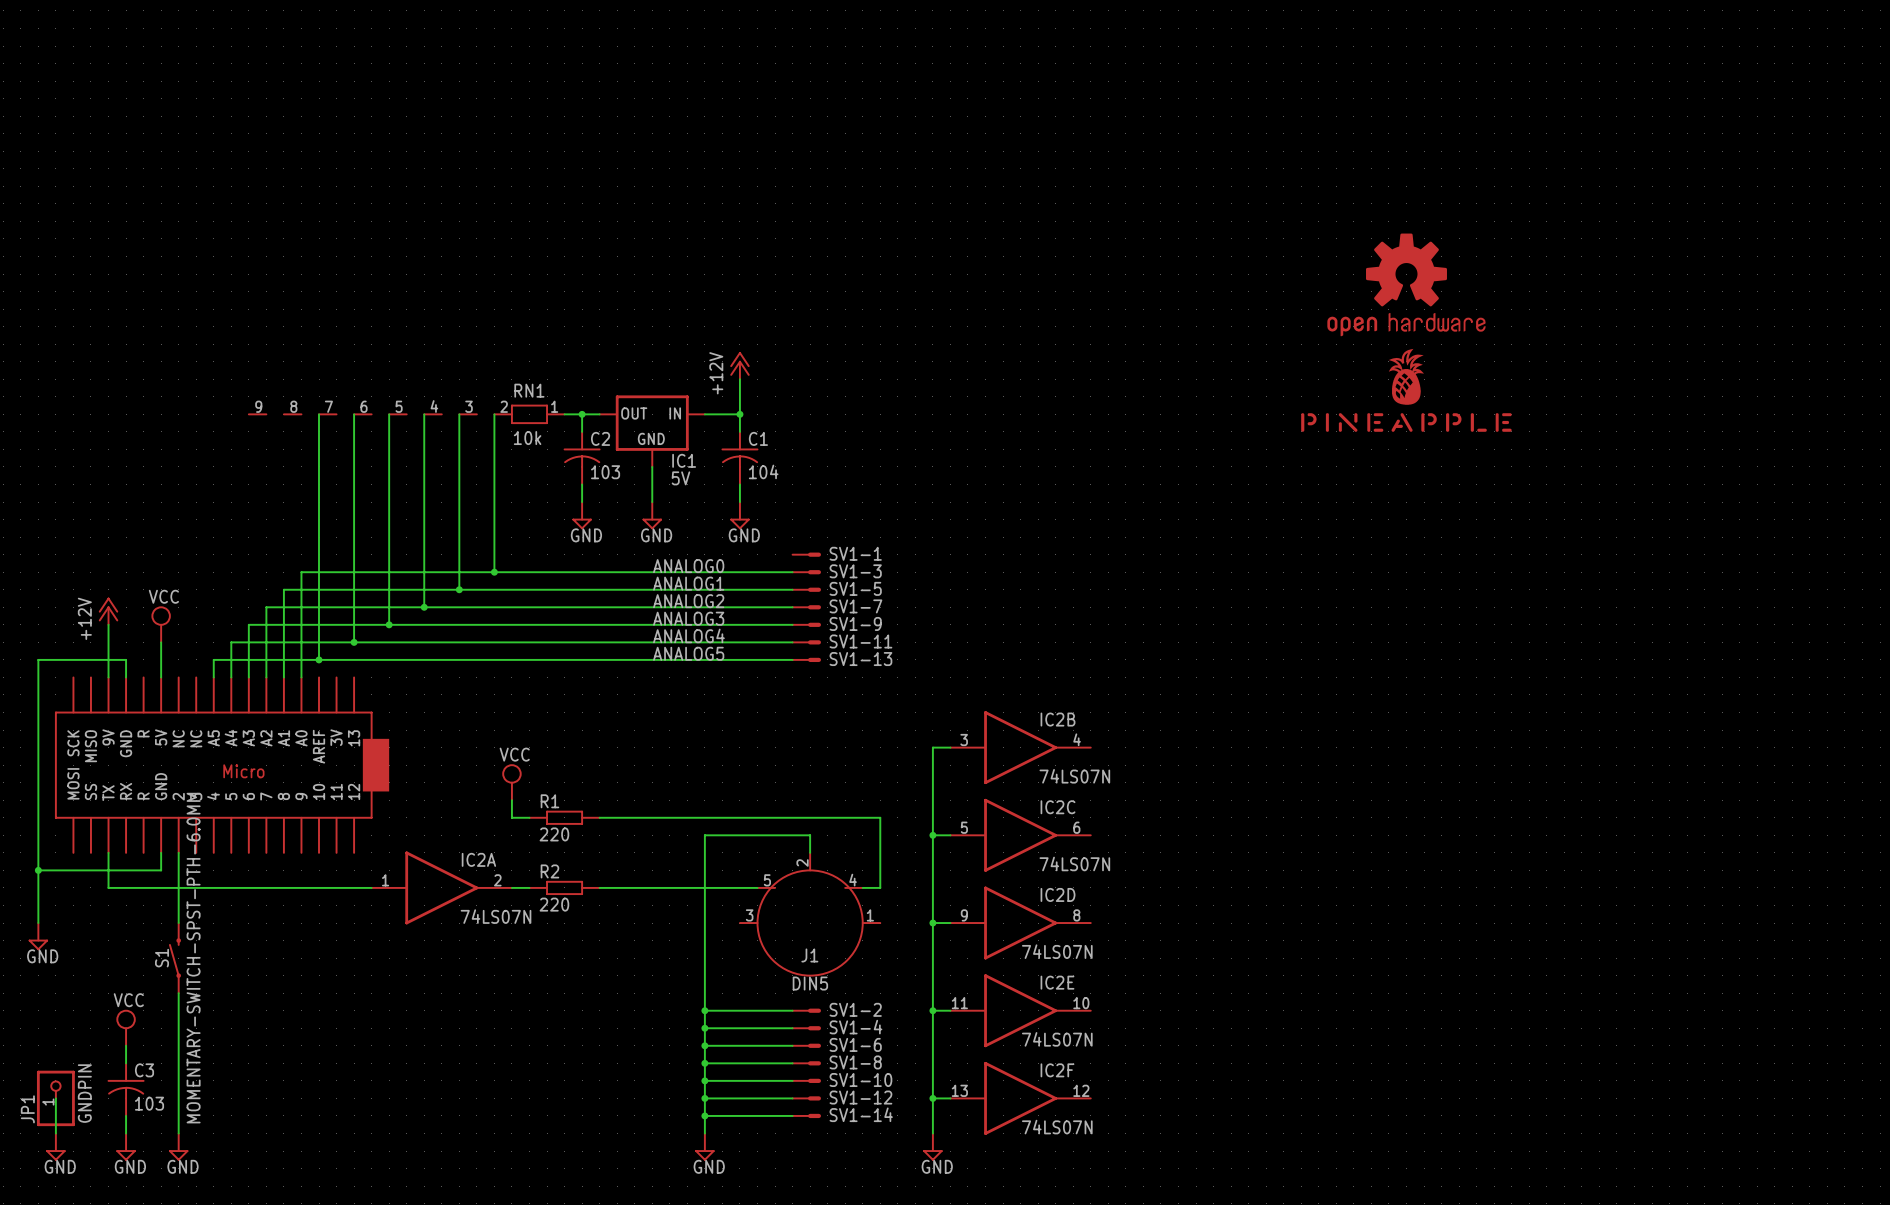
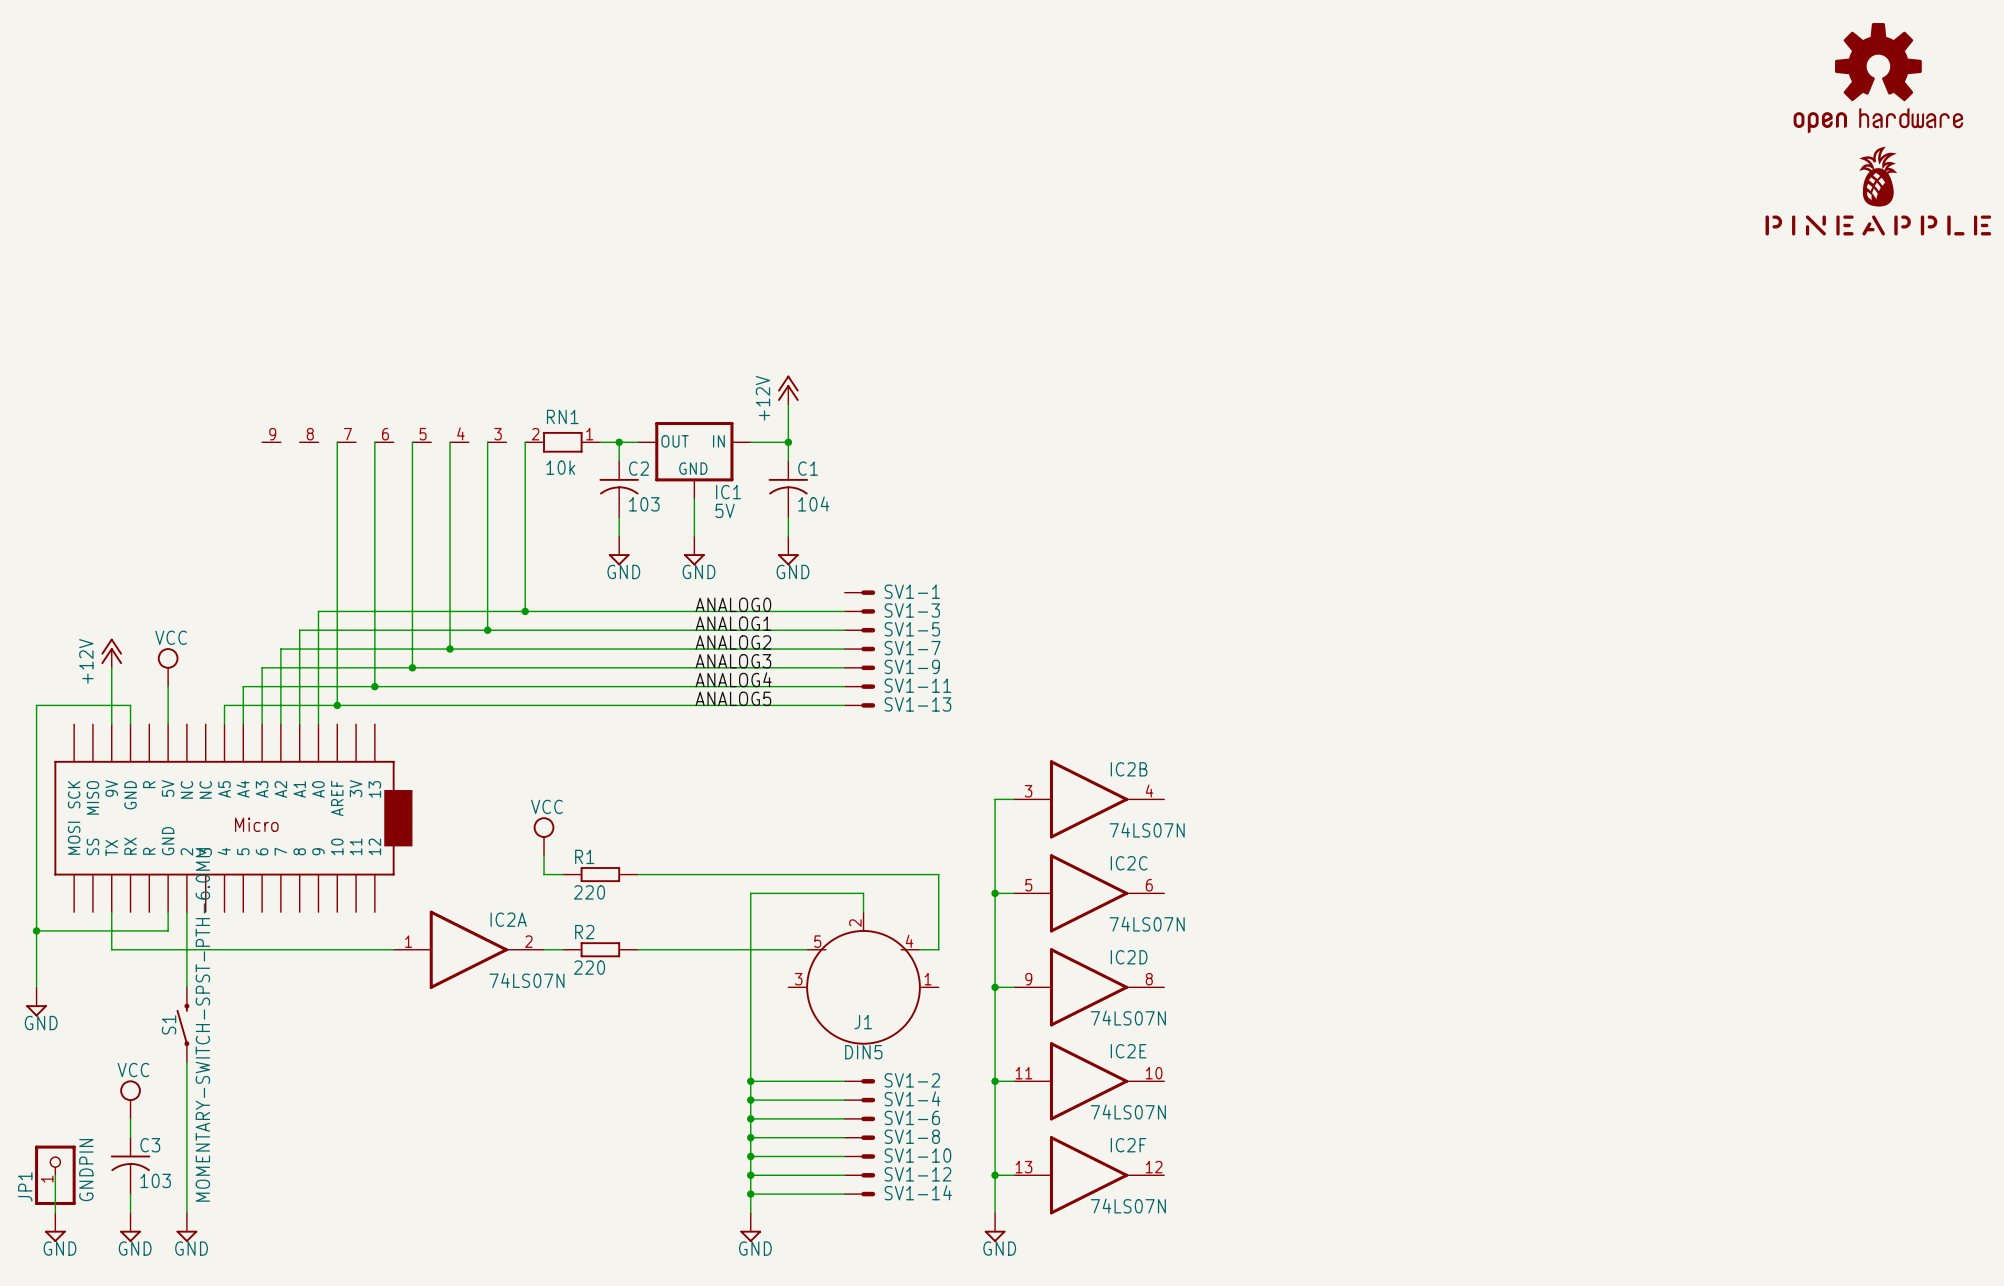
part: none -> (1878, 78)
part: none -> (1878, 191)
part: (1406, 284) -> none
part: (1406, 390) -> none

